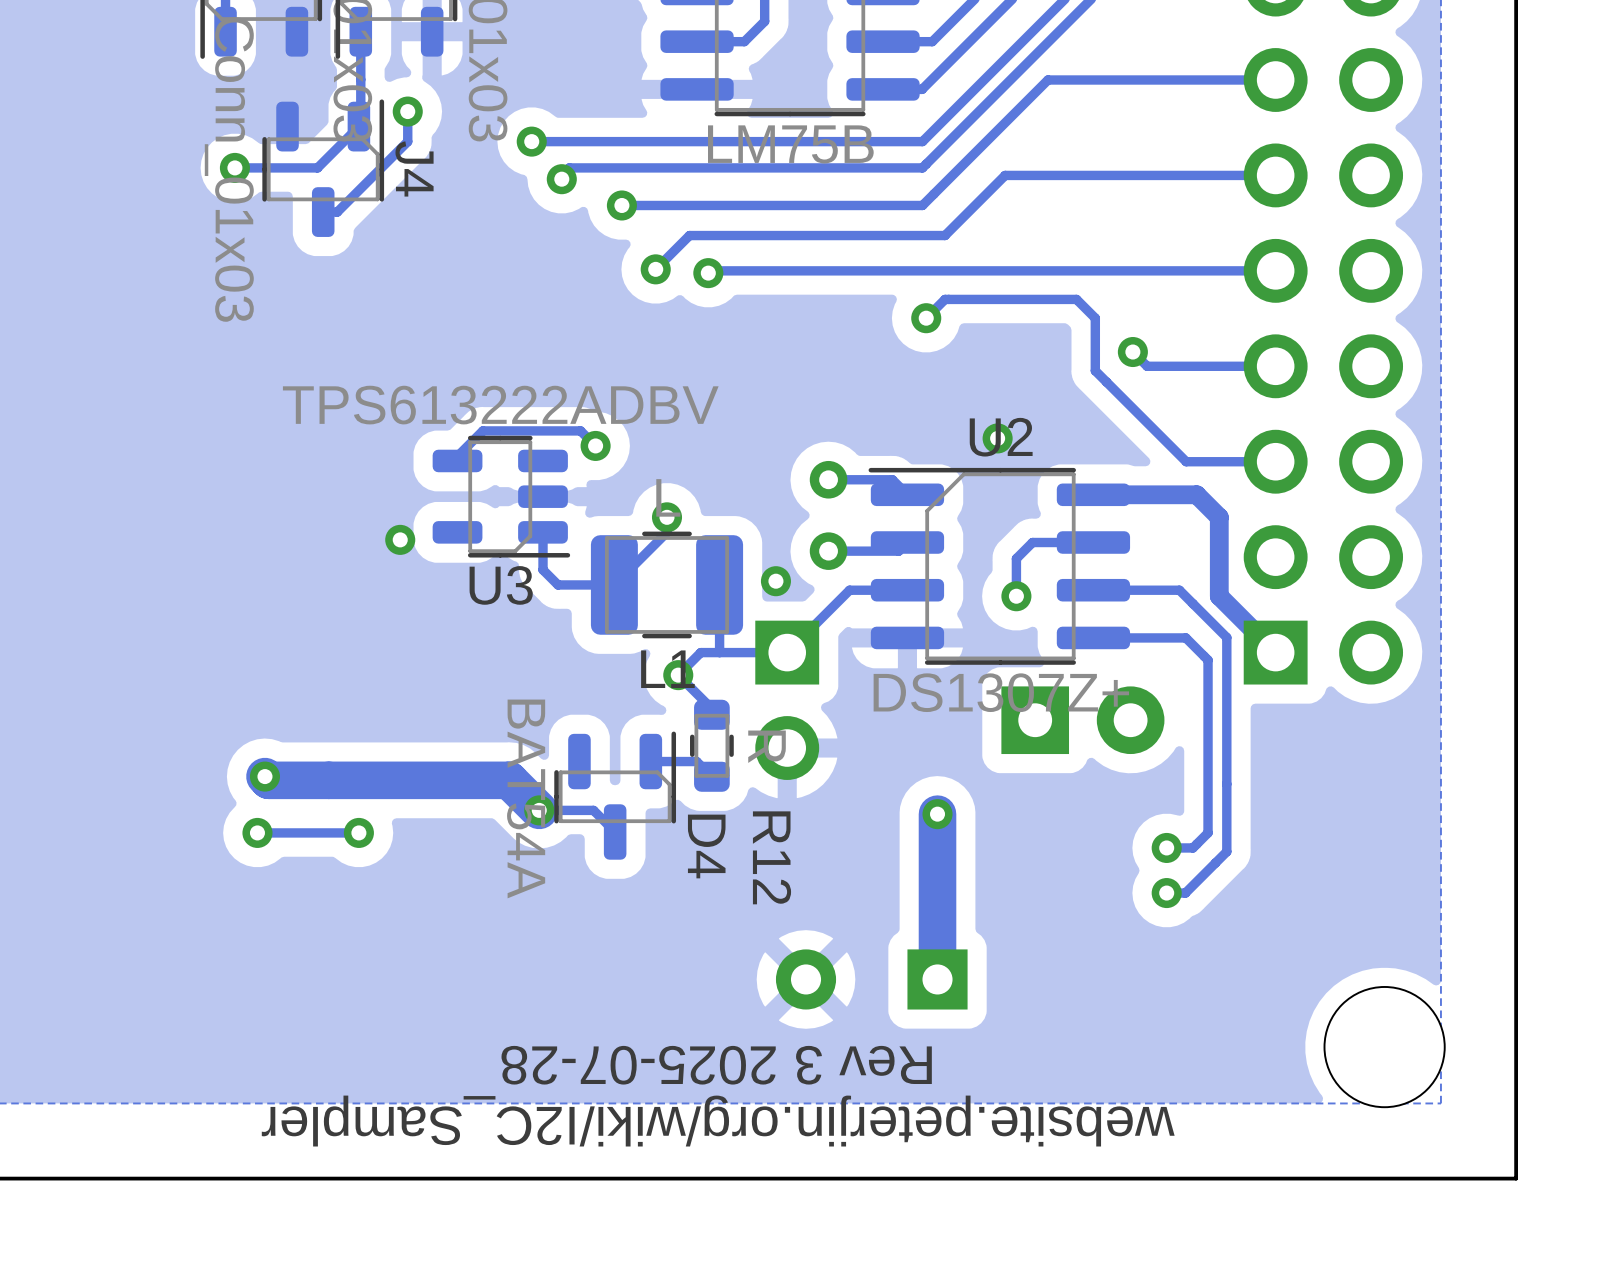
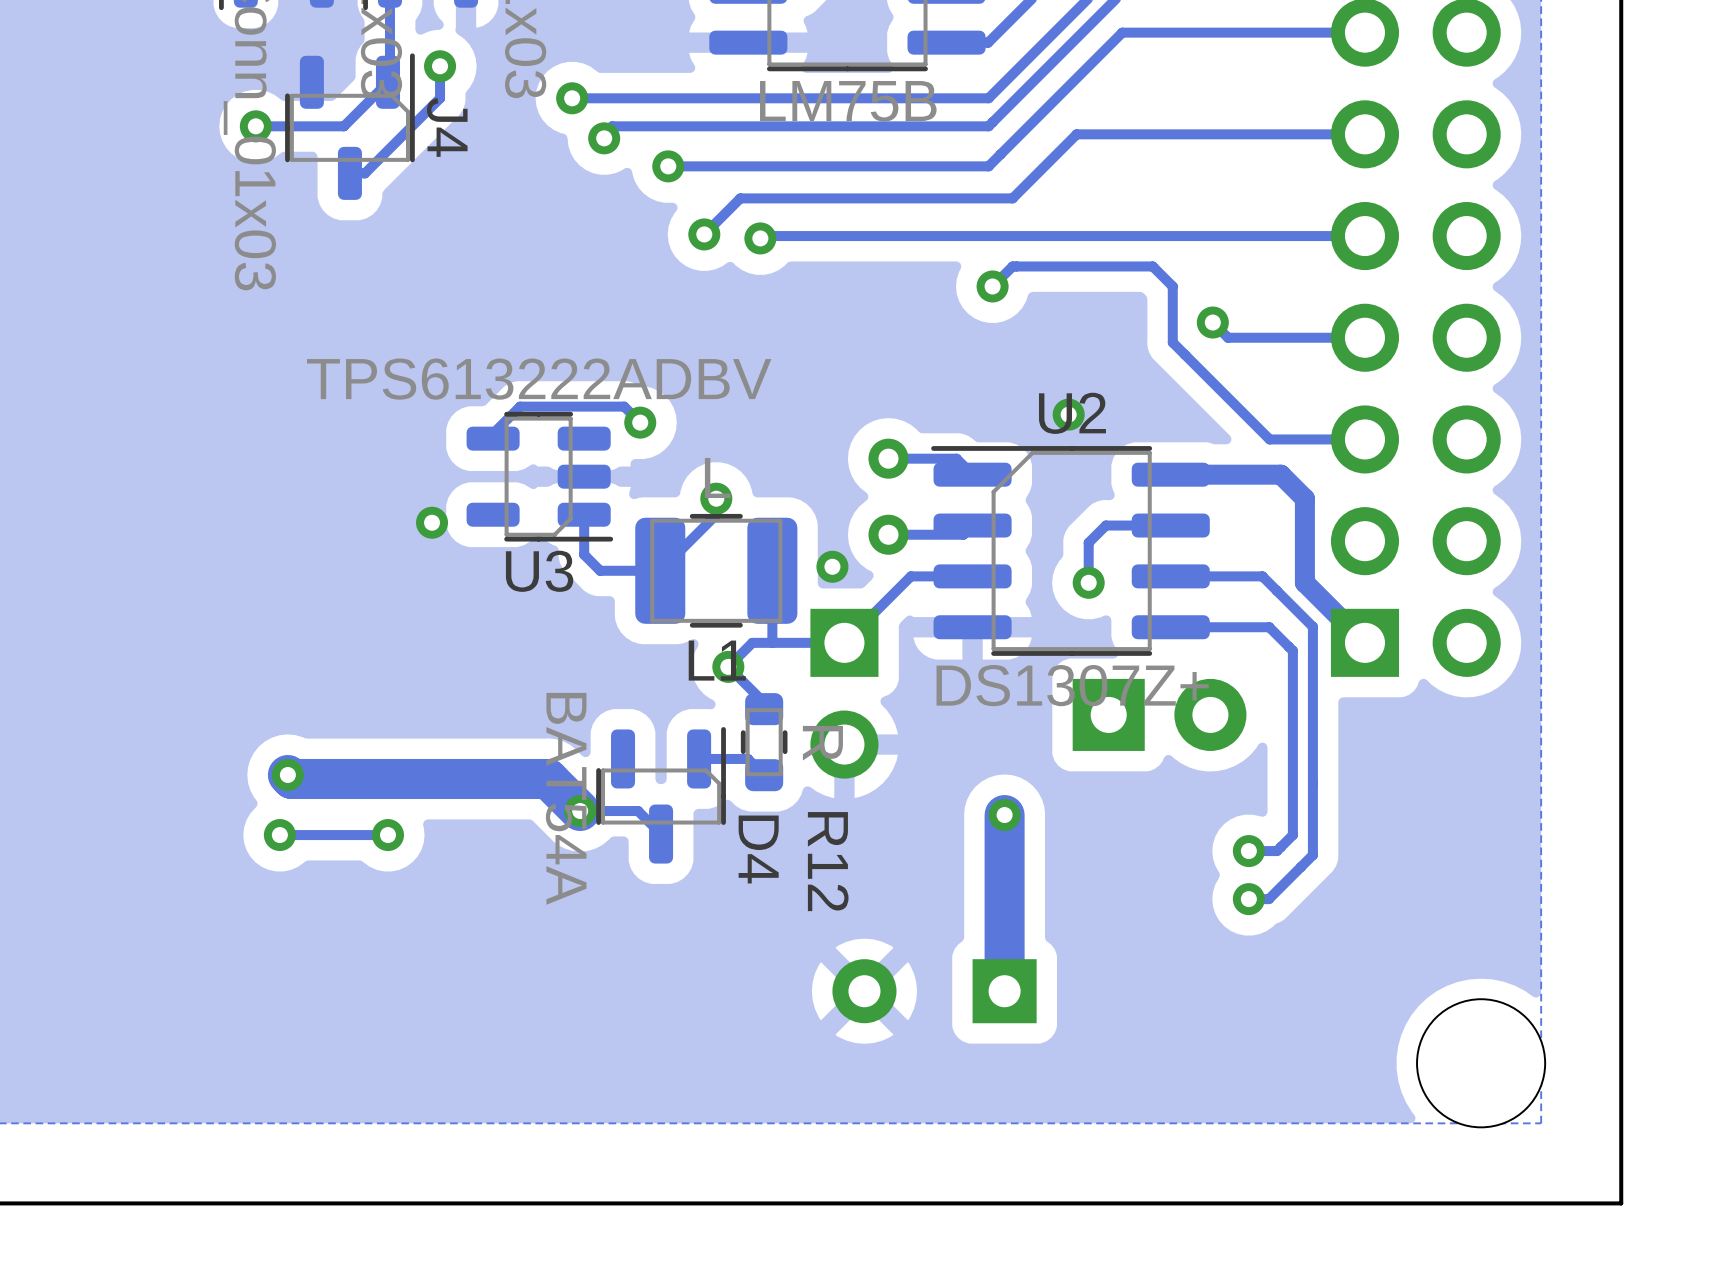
text: Rev 3 2025-07-28 (716, 1065) -> none
text: website.peterjin.org/wiki/I2C_Sampler (718, 1121) -> none

